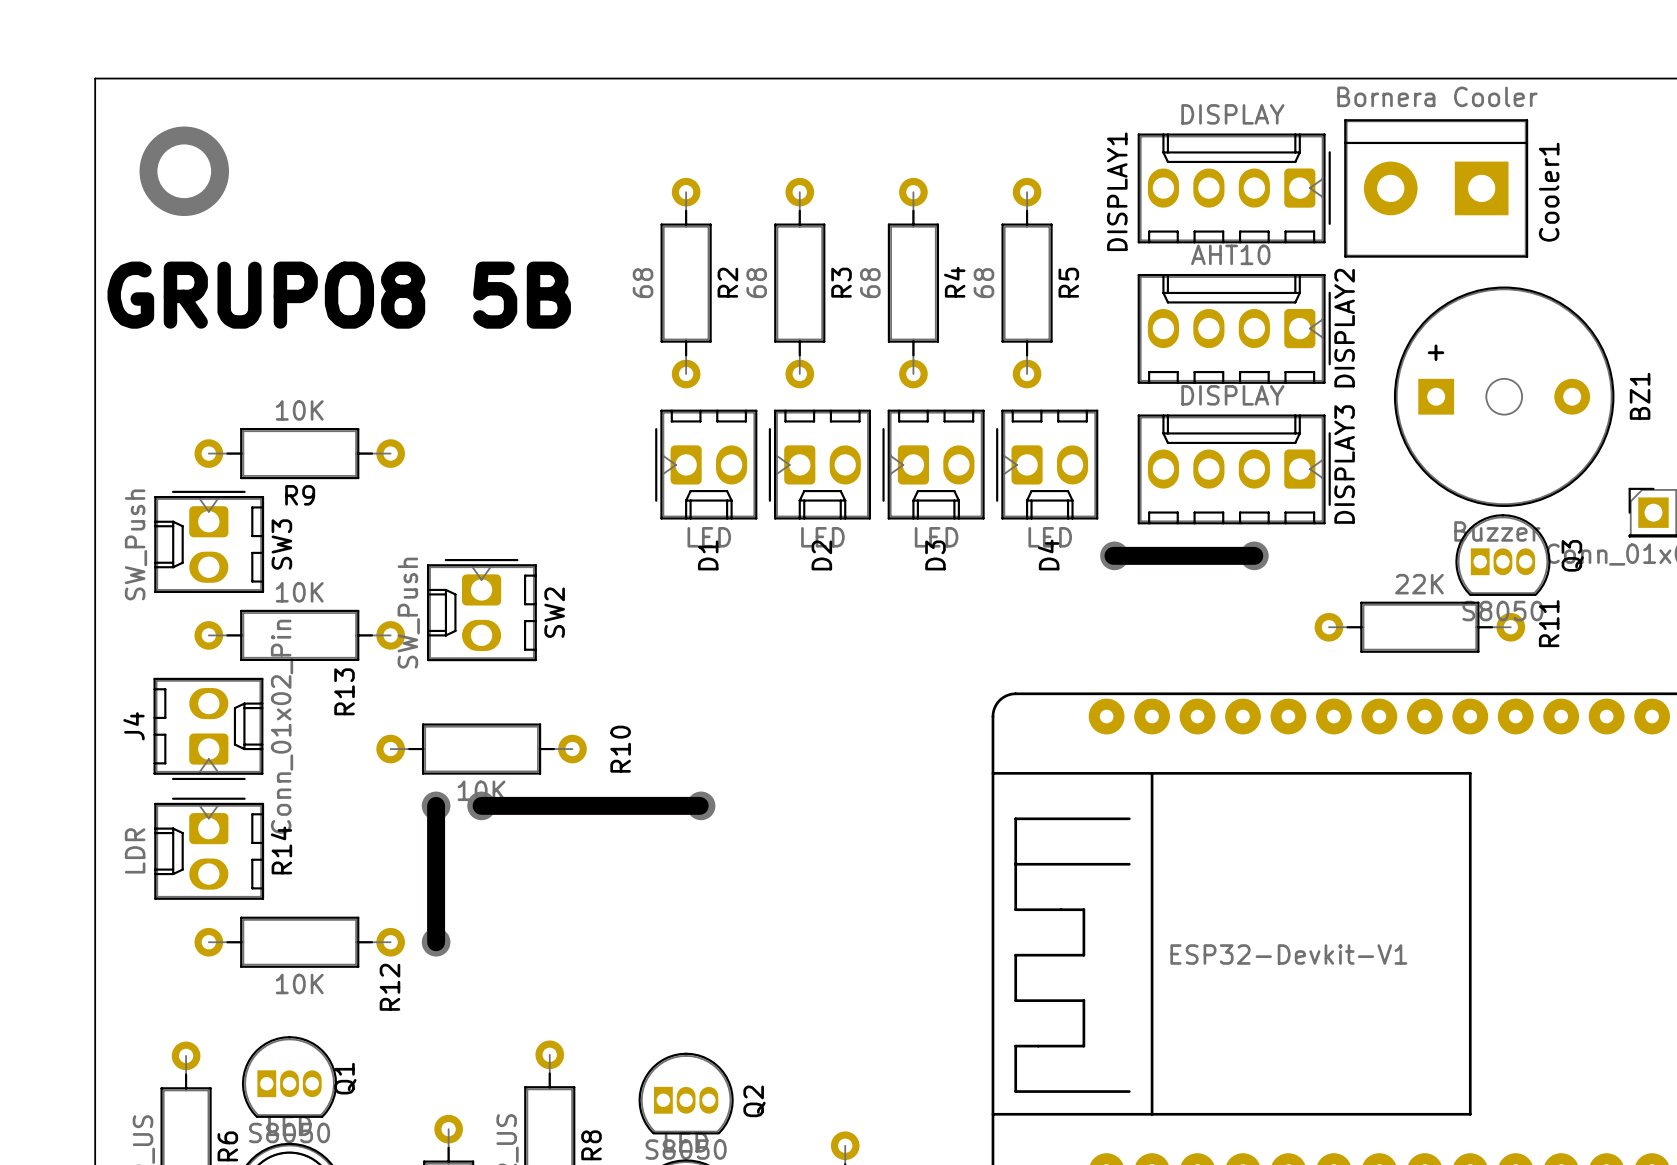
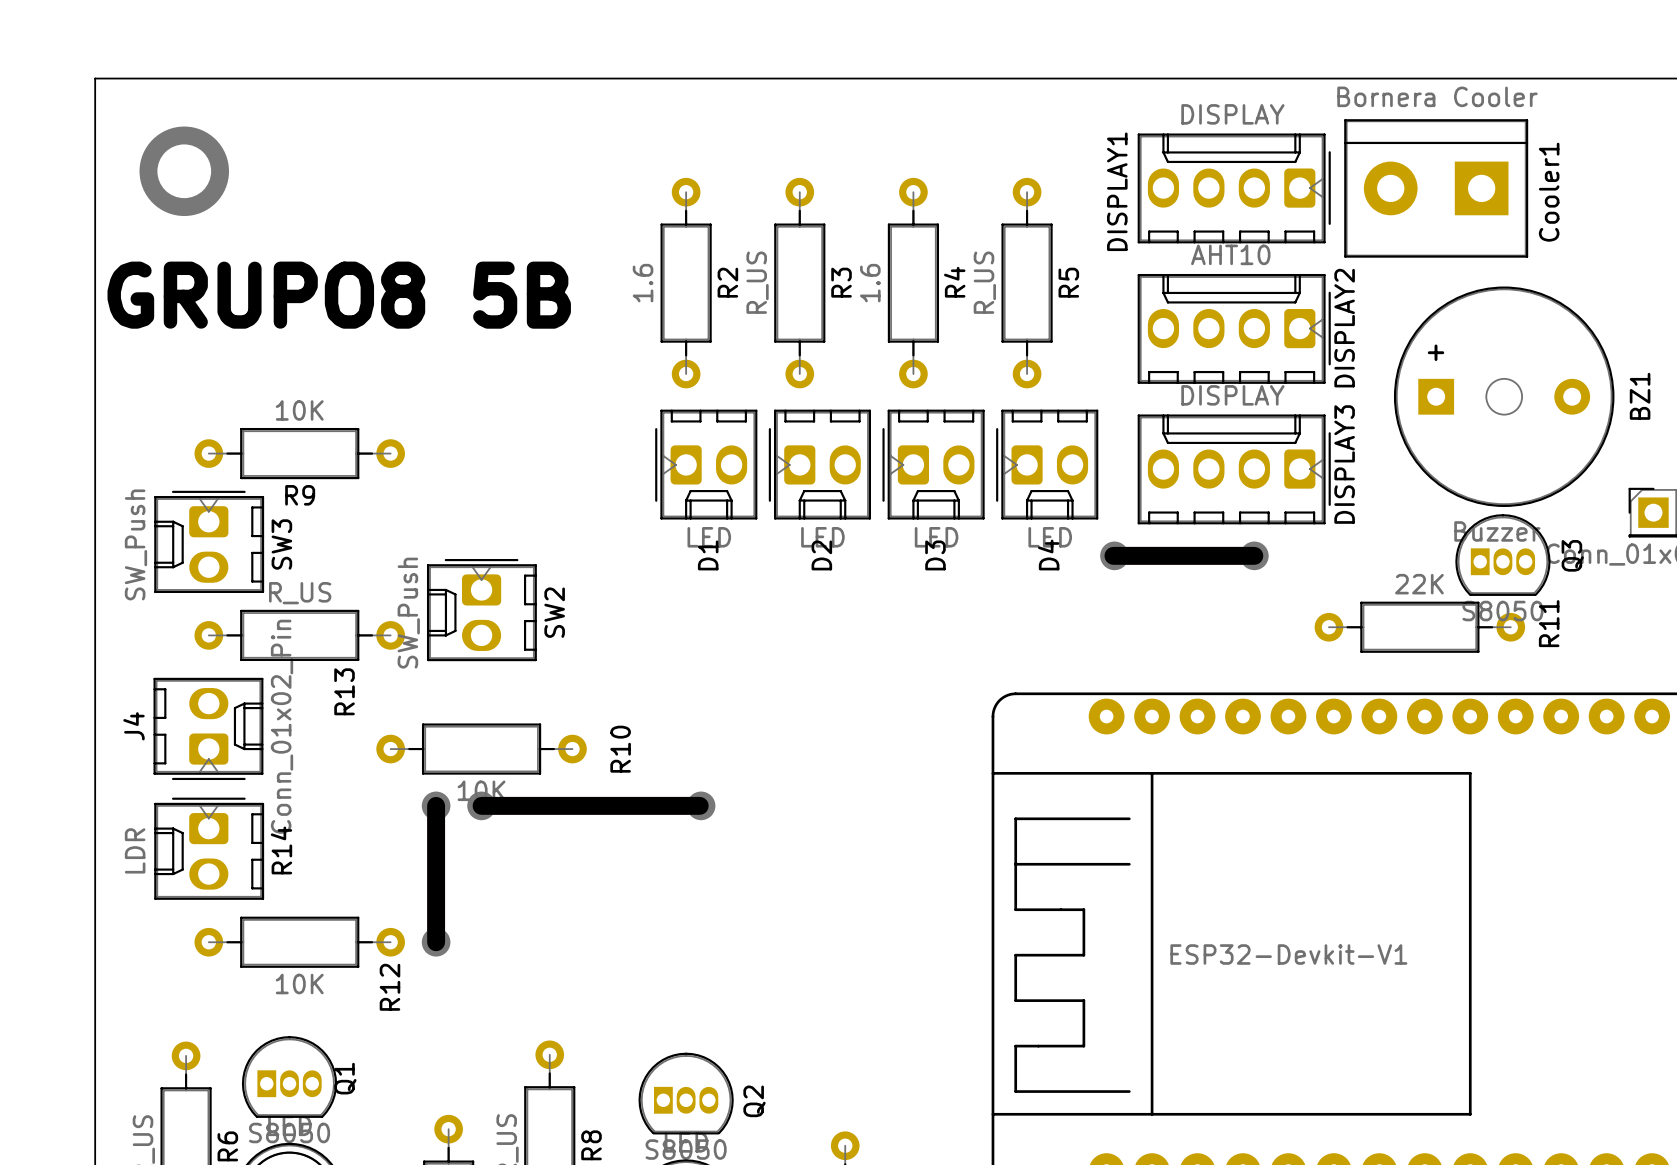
R2 value: 68 (643, 283) -> 1.6 (643, 283)
R3 value: 68 (756, 283) -> R_US (757, 282)
R4 value: 68 (870, 283) -> 1.6 (870, 283)
R5 value: 68 (983, 283) -> R_US (984, 282)
R13 value: 10K (299, 592) -> R_US (300, 593)

